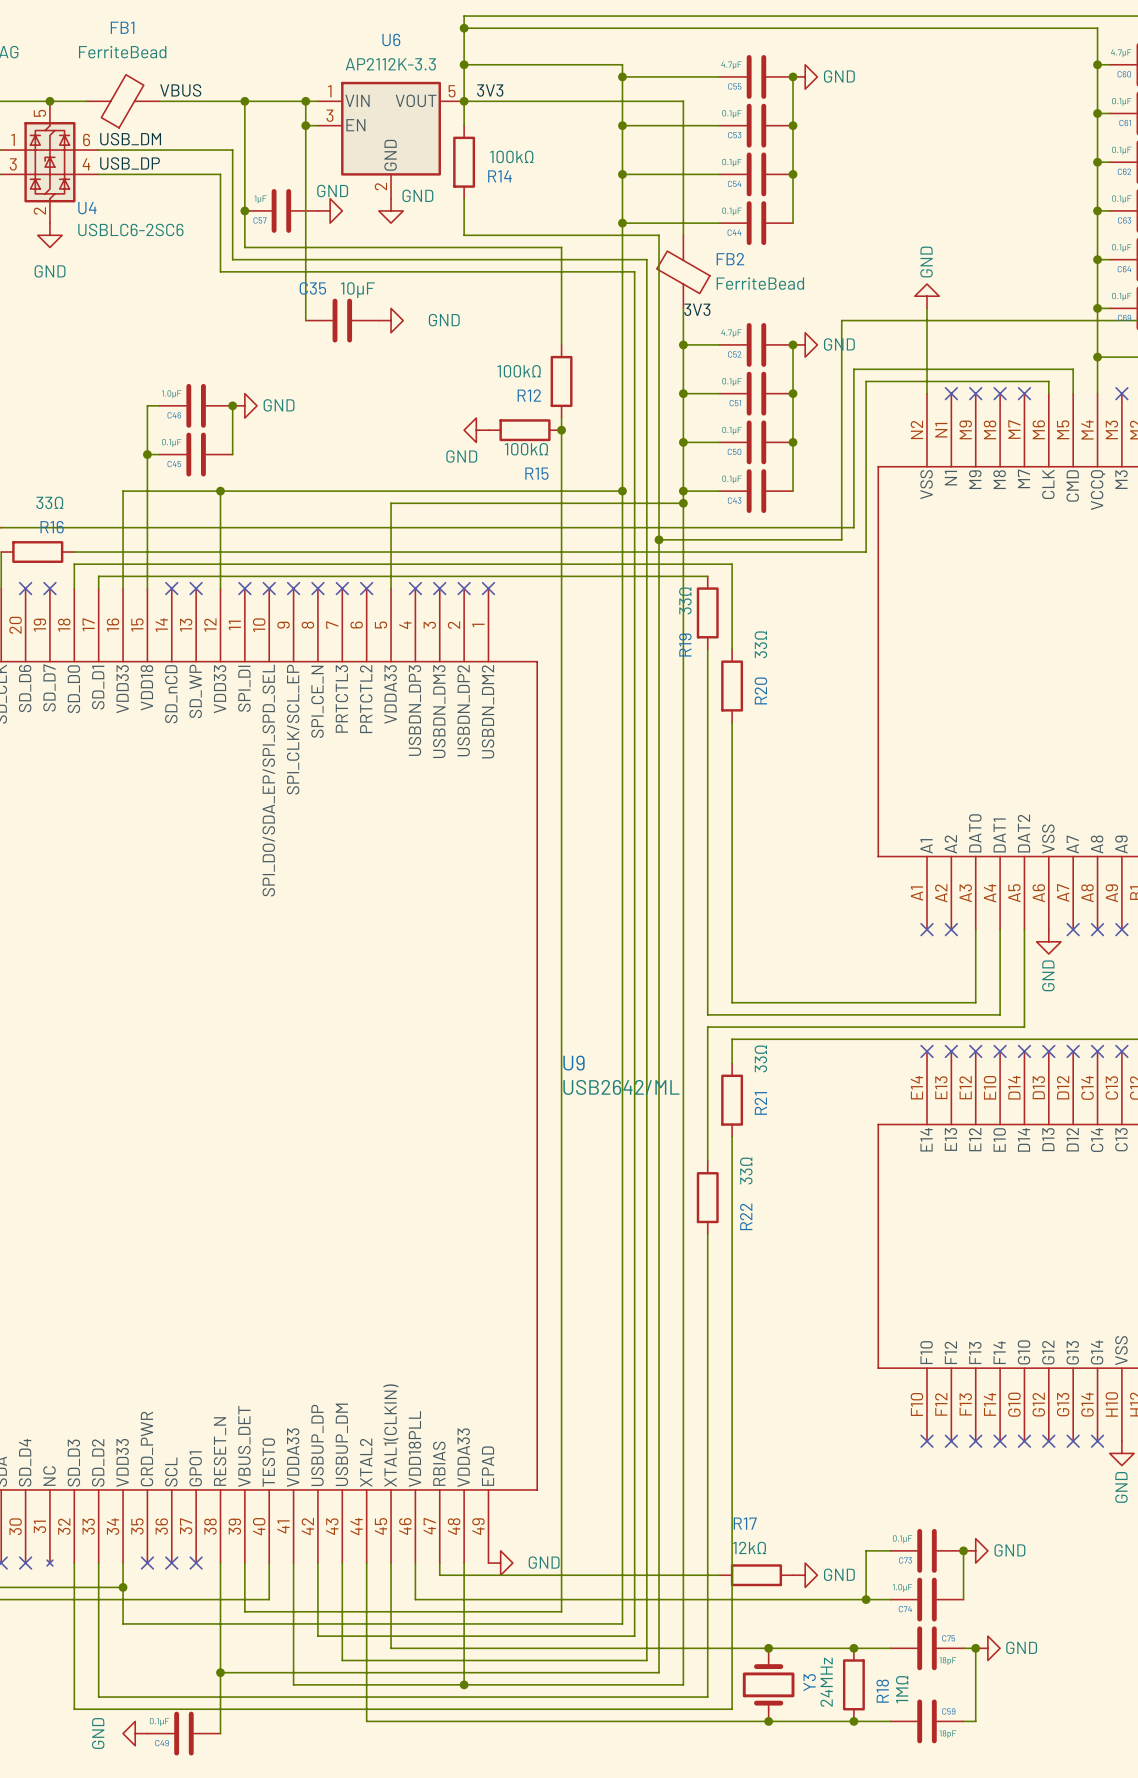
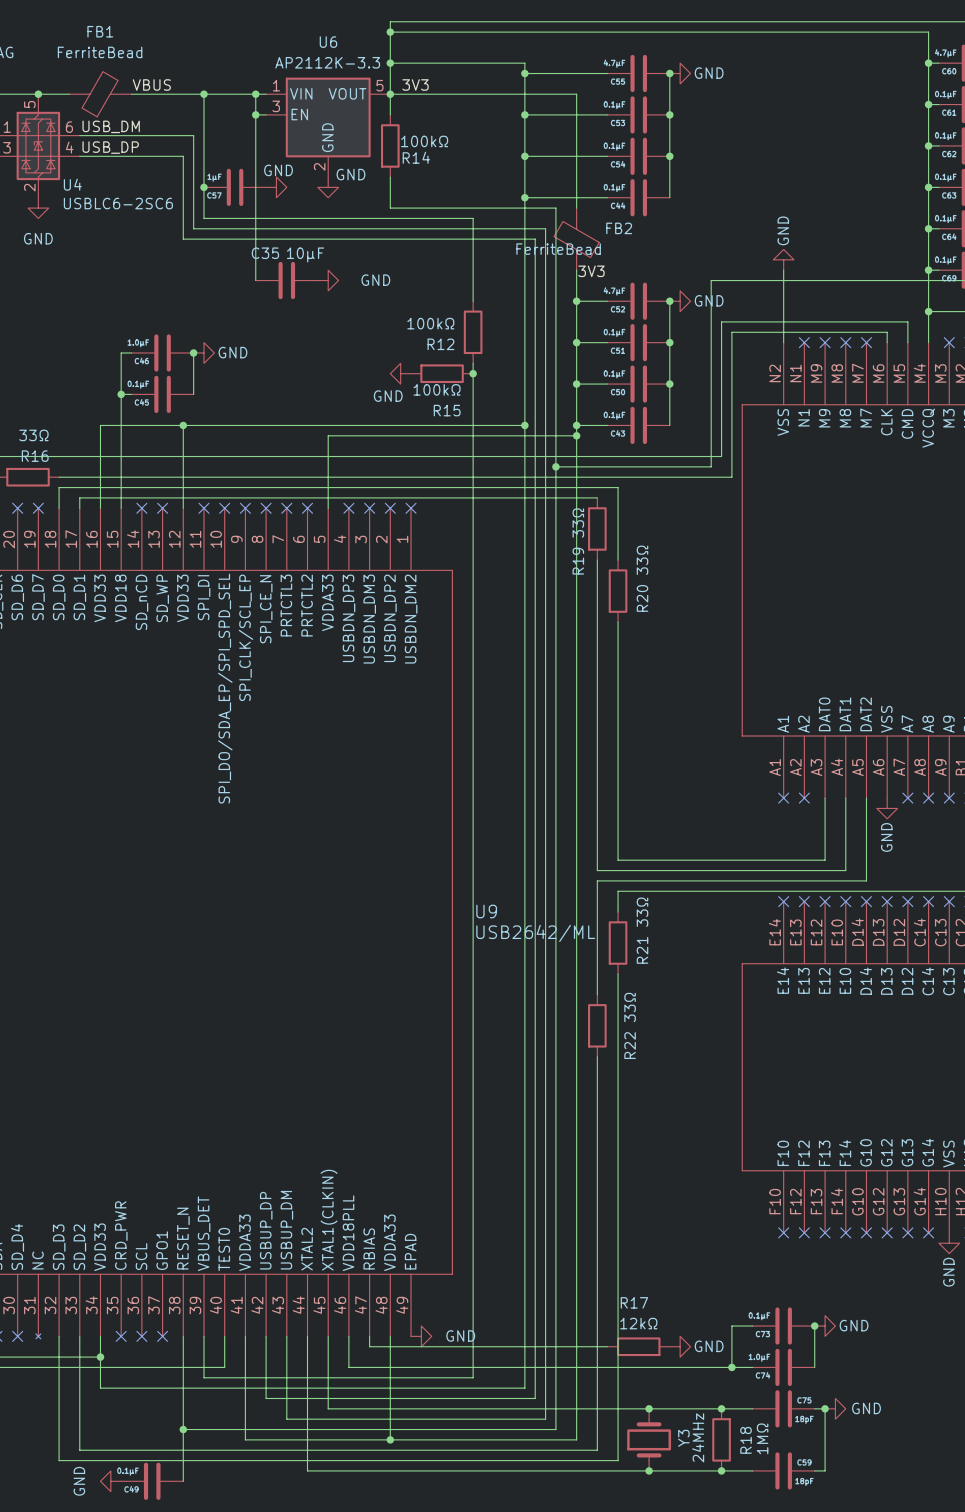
FB2 value position: FerriteBead (760, 283) -> FerriteBead (558, 249)

